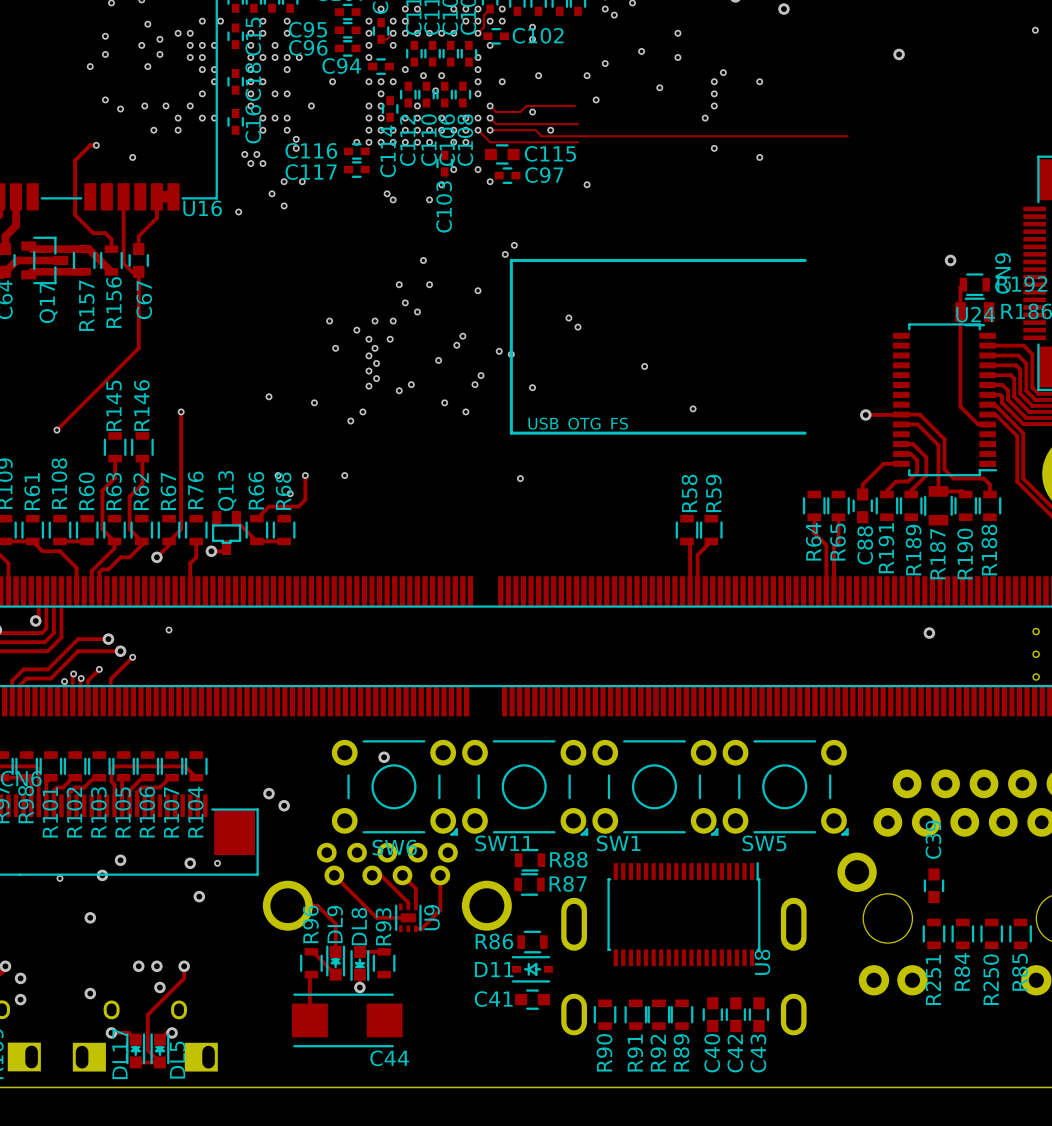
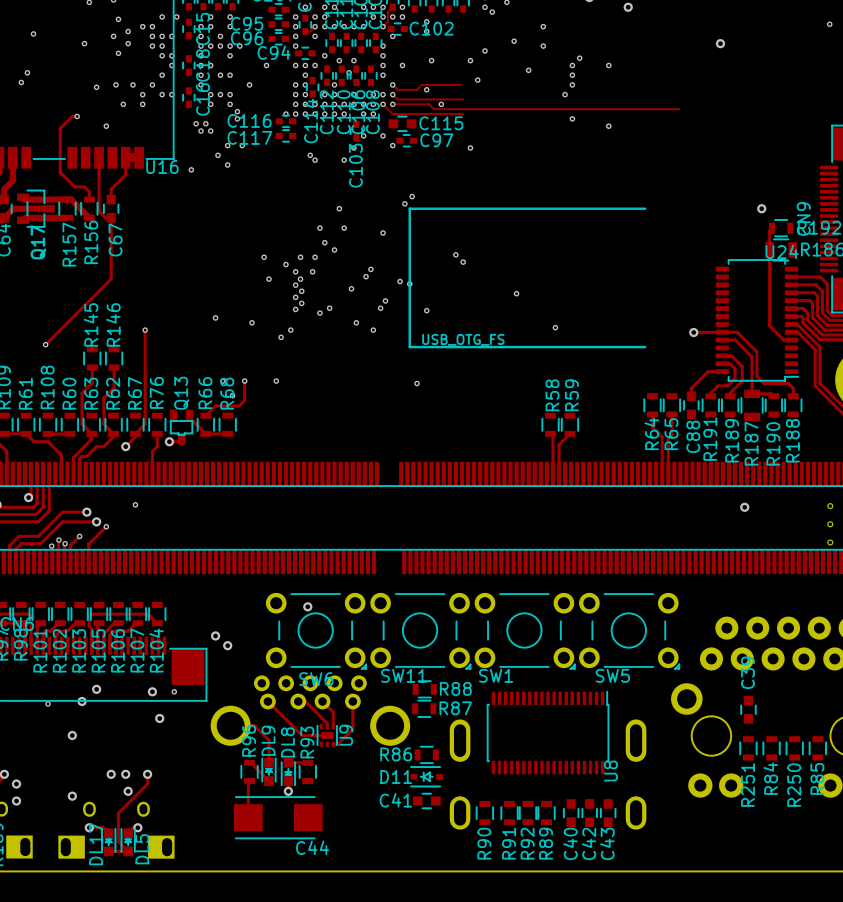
via: (105, 36) -> none
via: none -> (33, 33)
via: (90, 66) -> none
via: none -> (27, 72)
via: (105, 99) -> none
via: none -> (21, 82)

